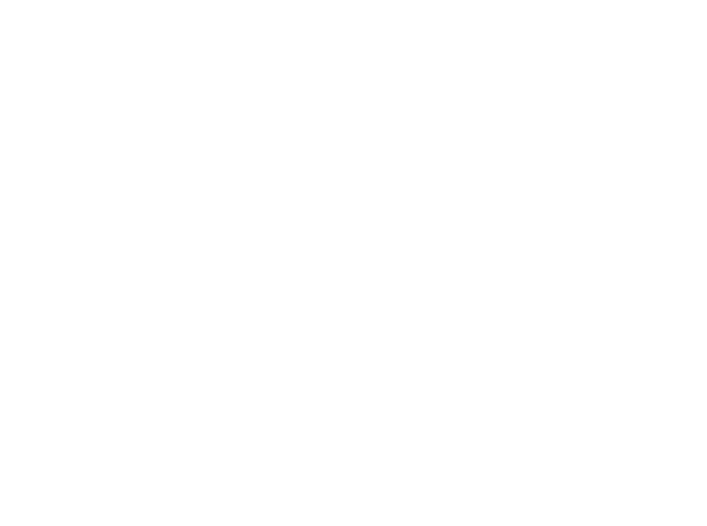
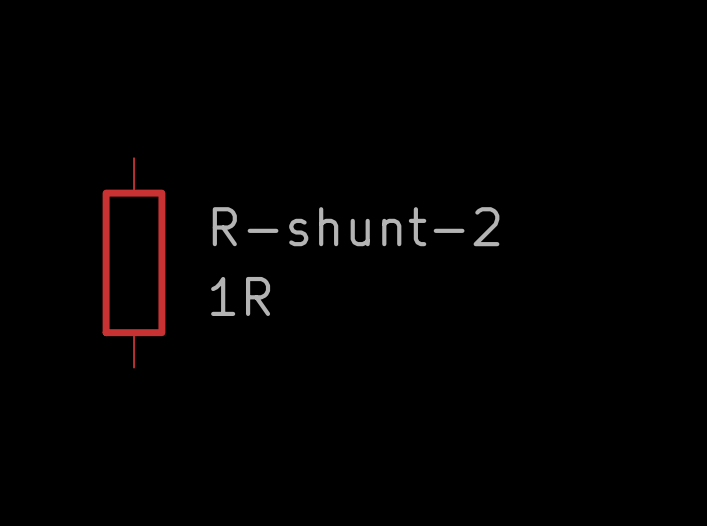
R-shunt-2: none -> 1R (134, 262)

